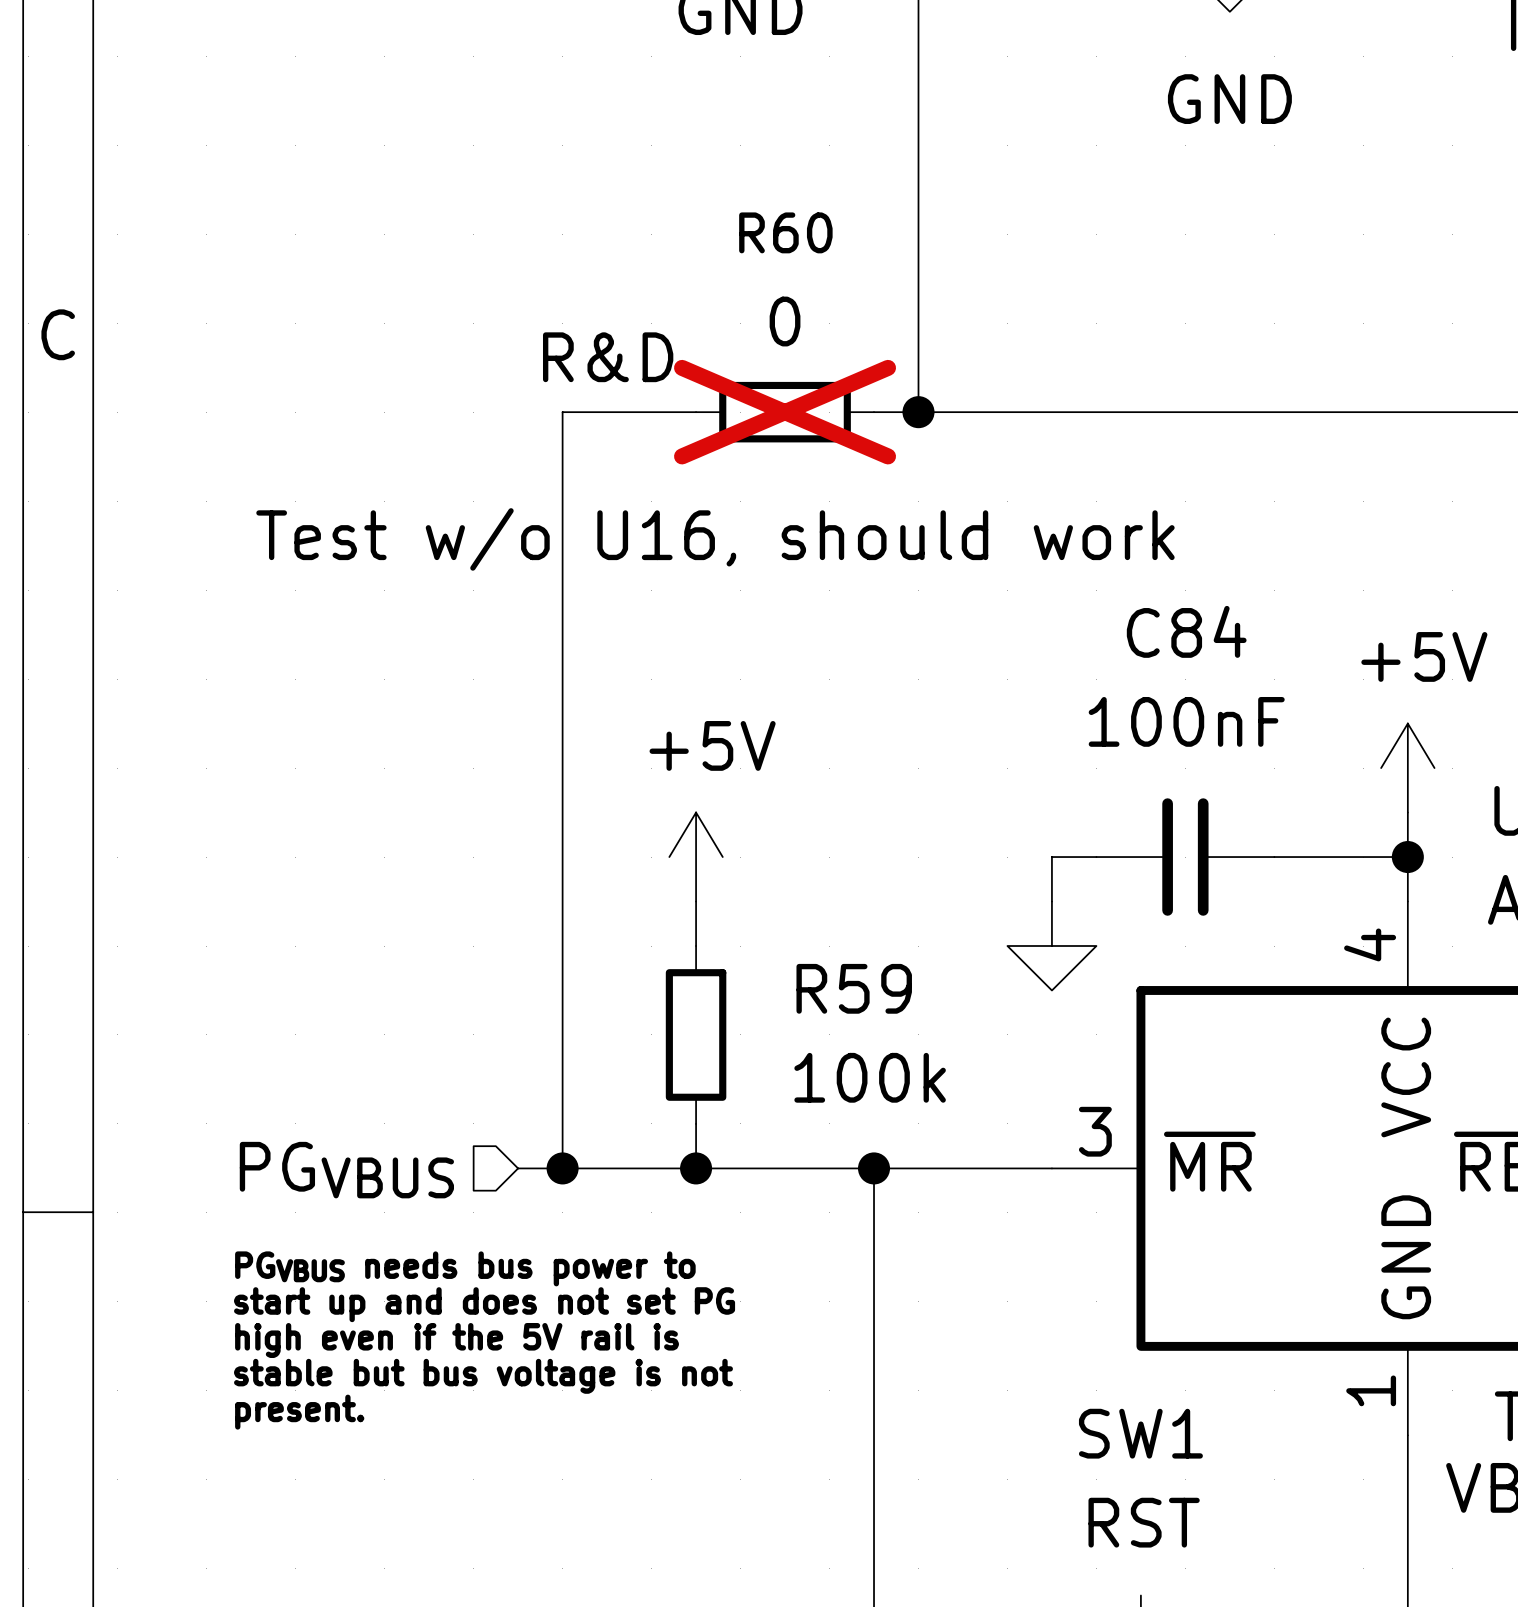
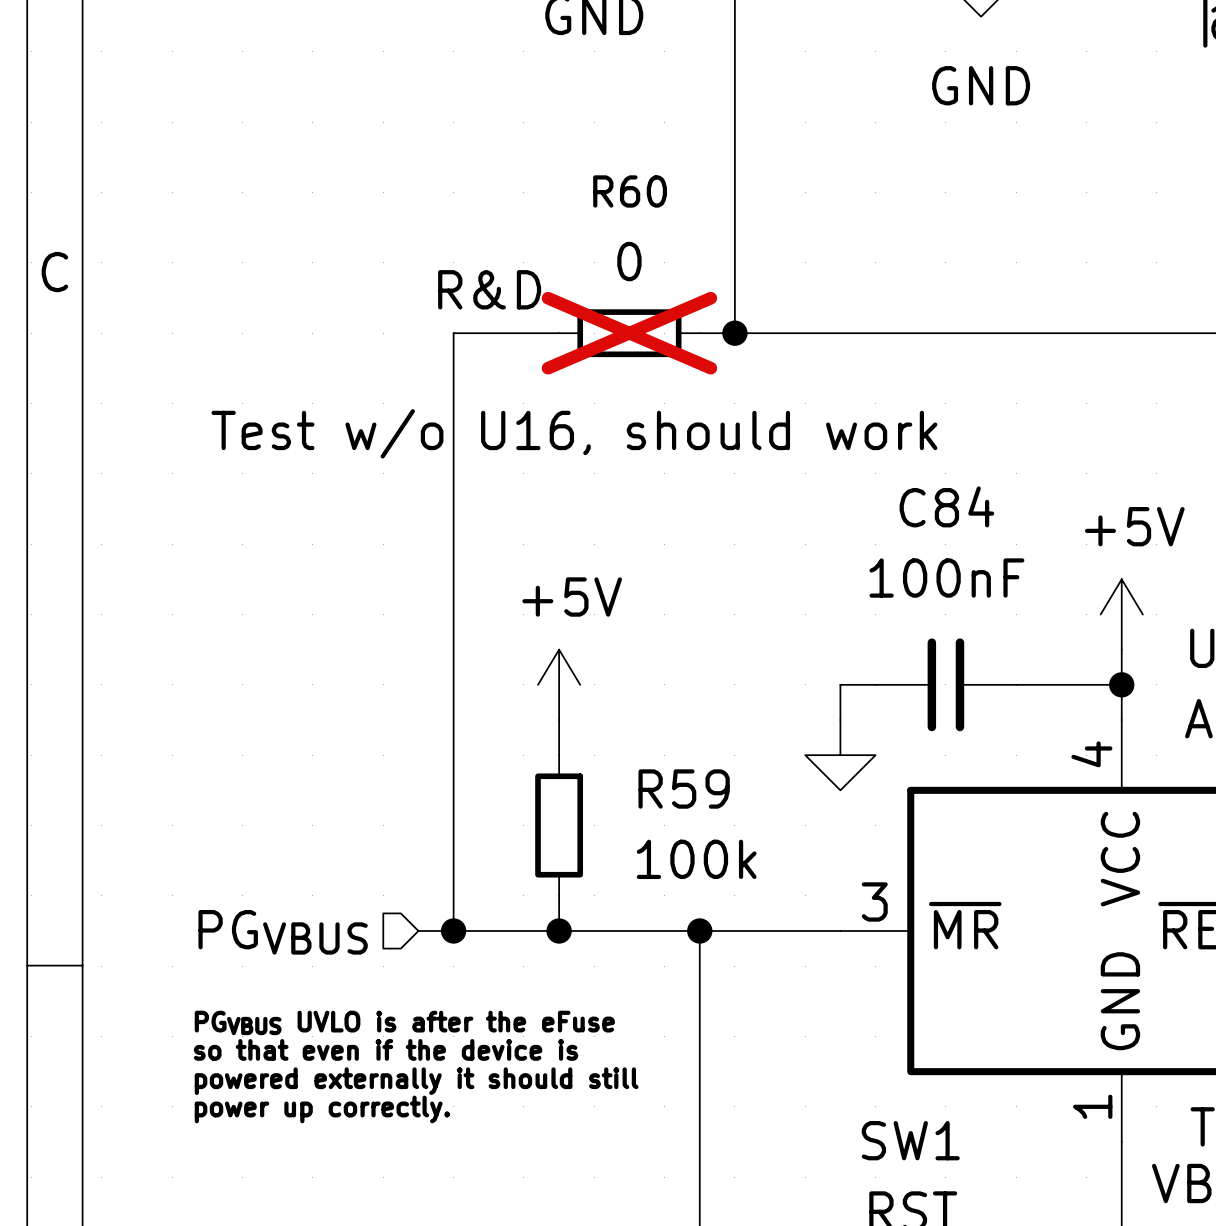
text: PGVBUS needs bus power to (465, 1268) -> none
text: none -> PGVBUS UVLO is after the eFuse (404, 1022)
text: start up and does not set PG (484, 1304) -> none
text: high even if the 5V rail is (457, 1340) -> so that even if the device is (386, 1049)
text: none -> powered externally it should still (416, 1081)
text: stable but bus voltage is not (483, 1376) -> none
text: none -> power up correctly. (322, 1109)
text: present. (299, 1412) -> none

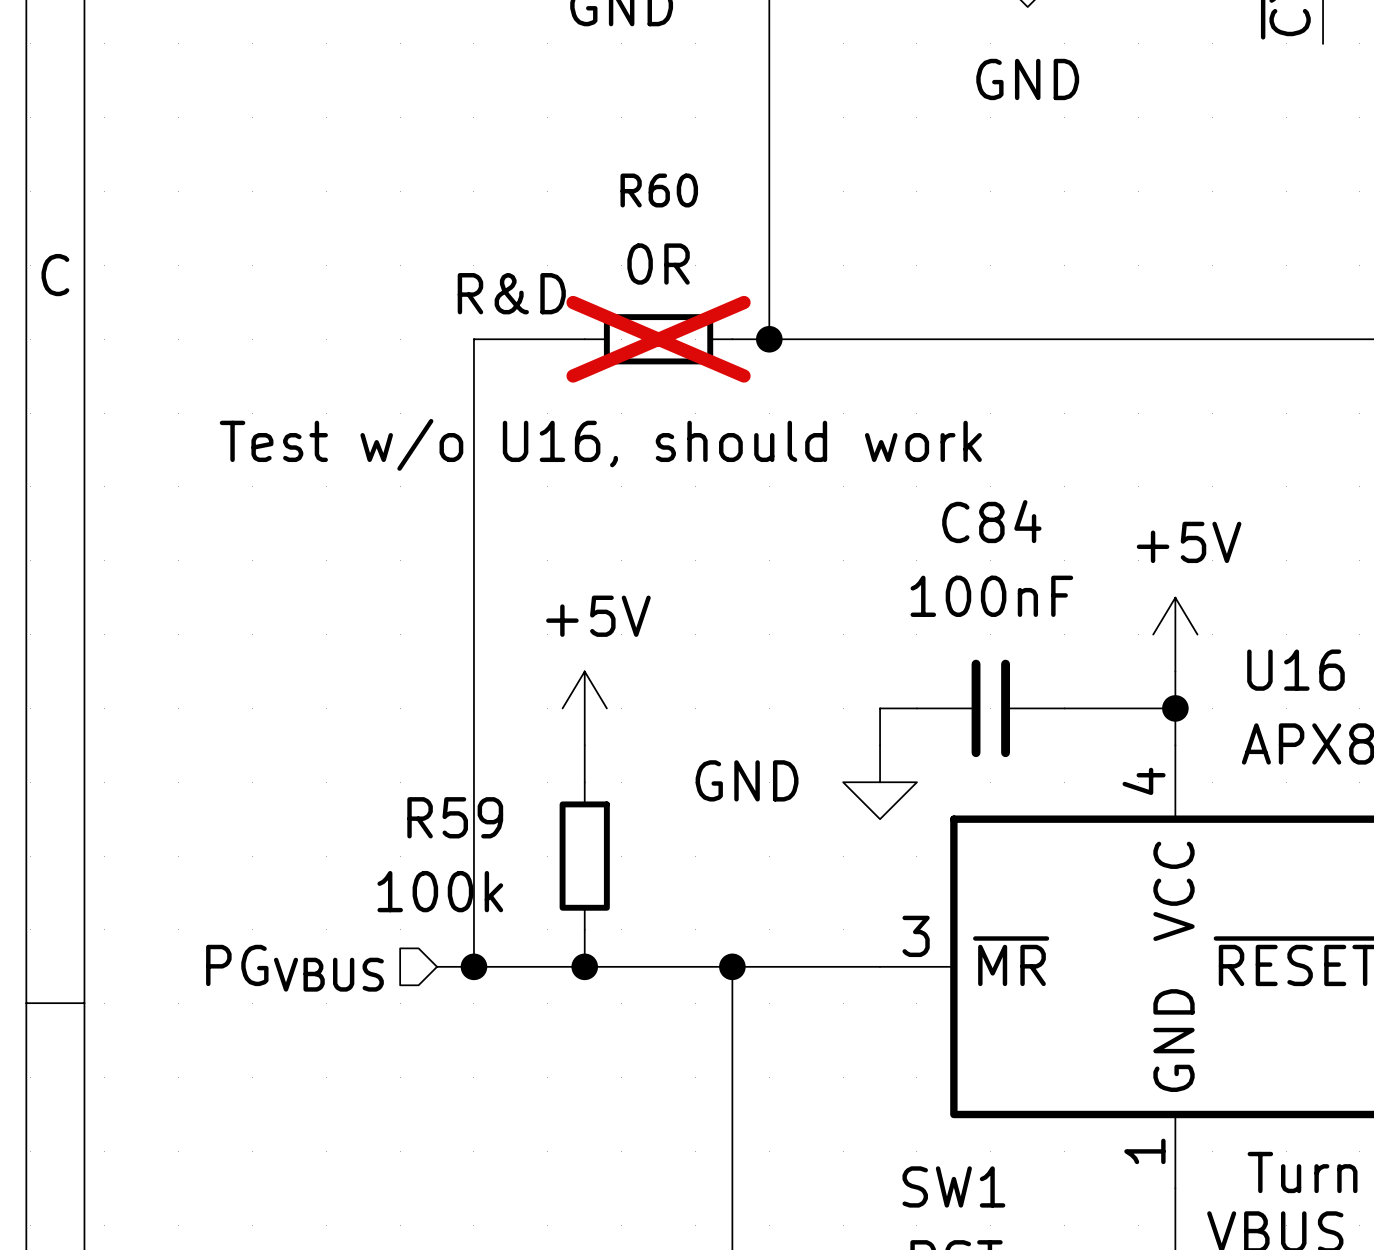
R60 value: 0 (629, 261) -> 0R (658, 264)
power symbol text: none -> GND (747, 780)
R59 name position: R59 (684, 789) -> R59 (455, 817)
R59 value position: 100k (696, 859) -> 100k (440, 891)
text: PGVBUS UVLO is after the eFuse (404, 1022) -> none
text: so that even if the device is (386, 1049) -> none
text: powered externally it should still (416, 1081) -> none
text: power up correctly. (322, 1109) -> none

